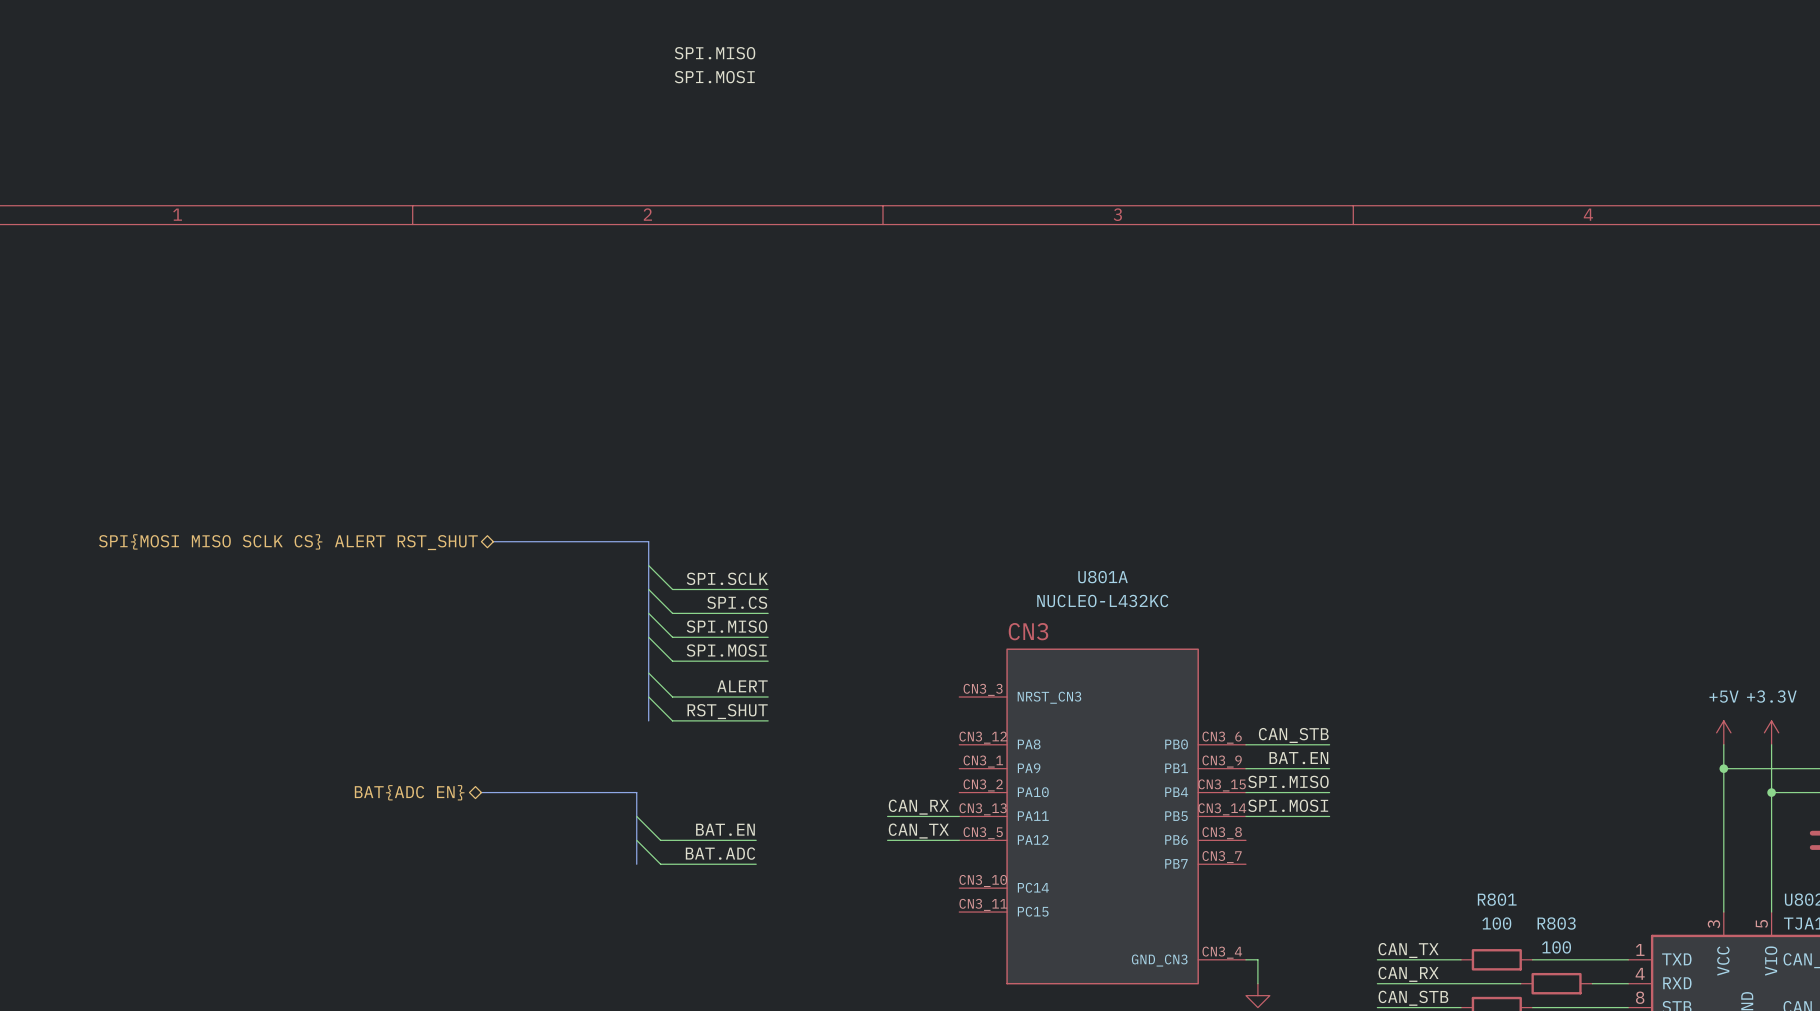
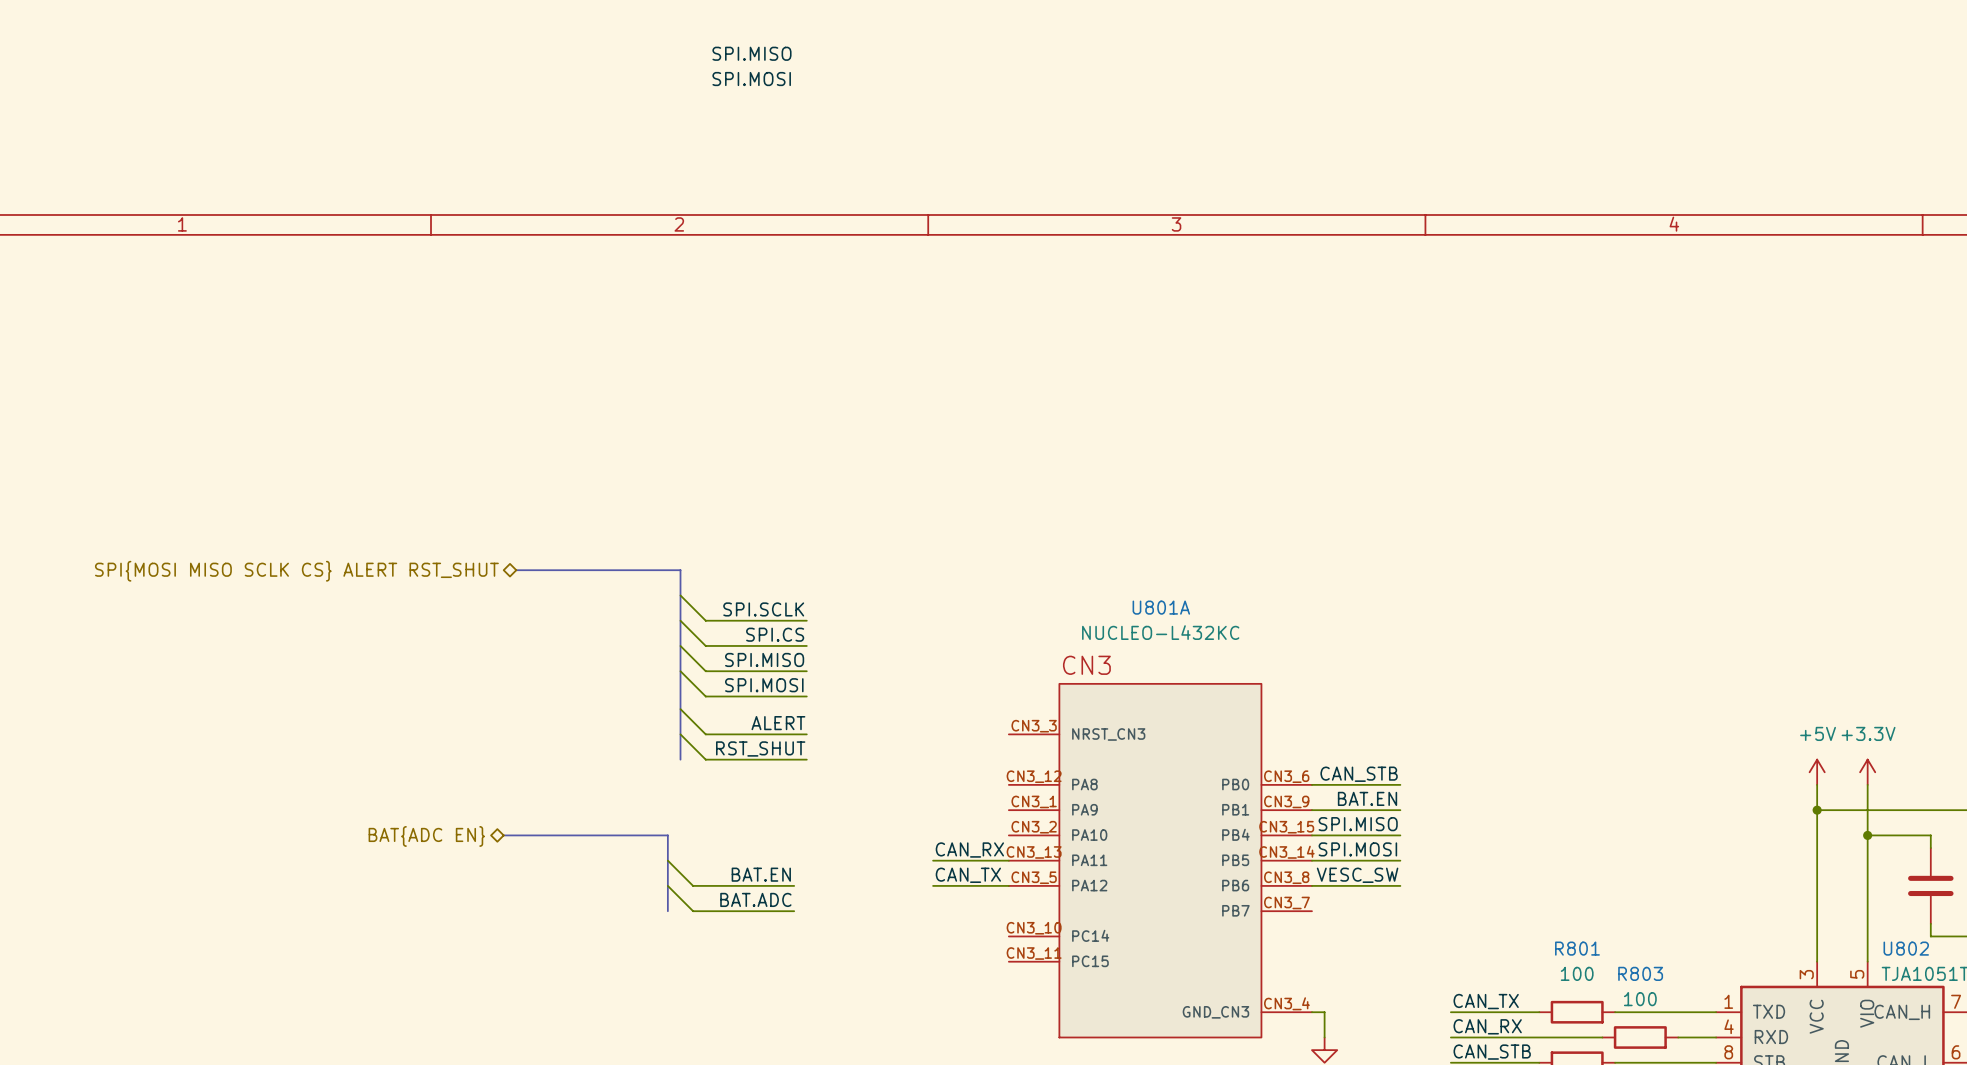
label: none -> VESC_SW (1357, 875)
wire: none -> (1311, 885) (1400, 885)

